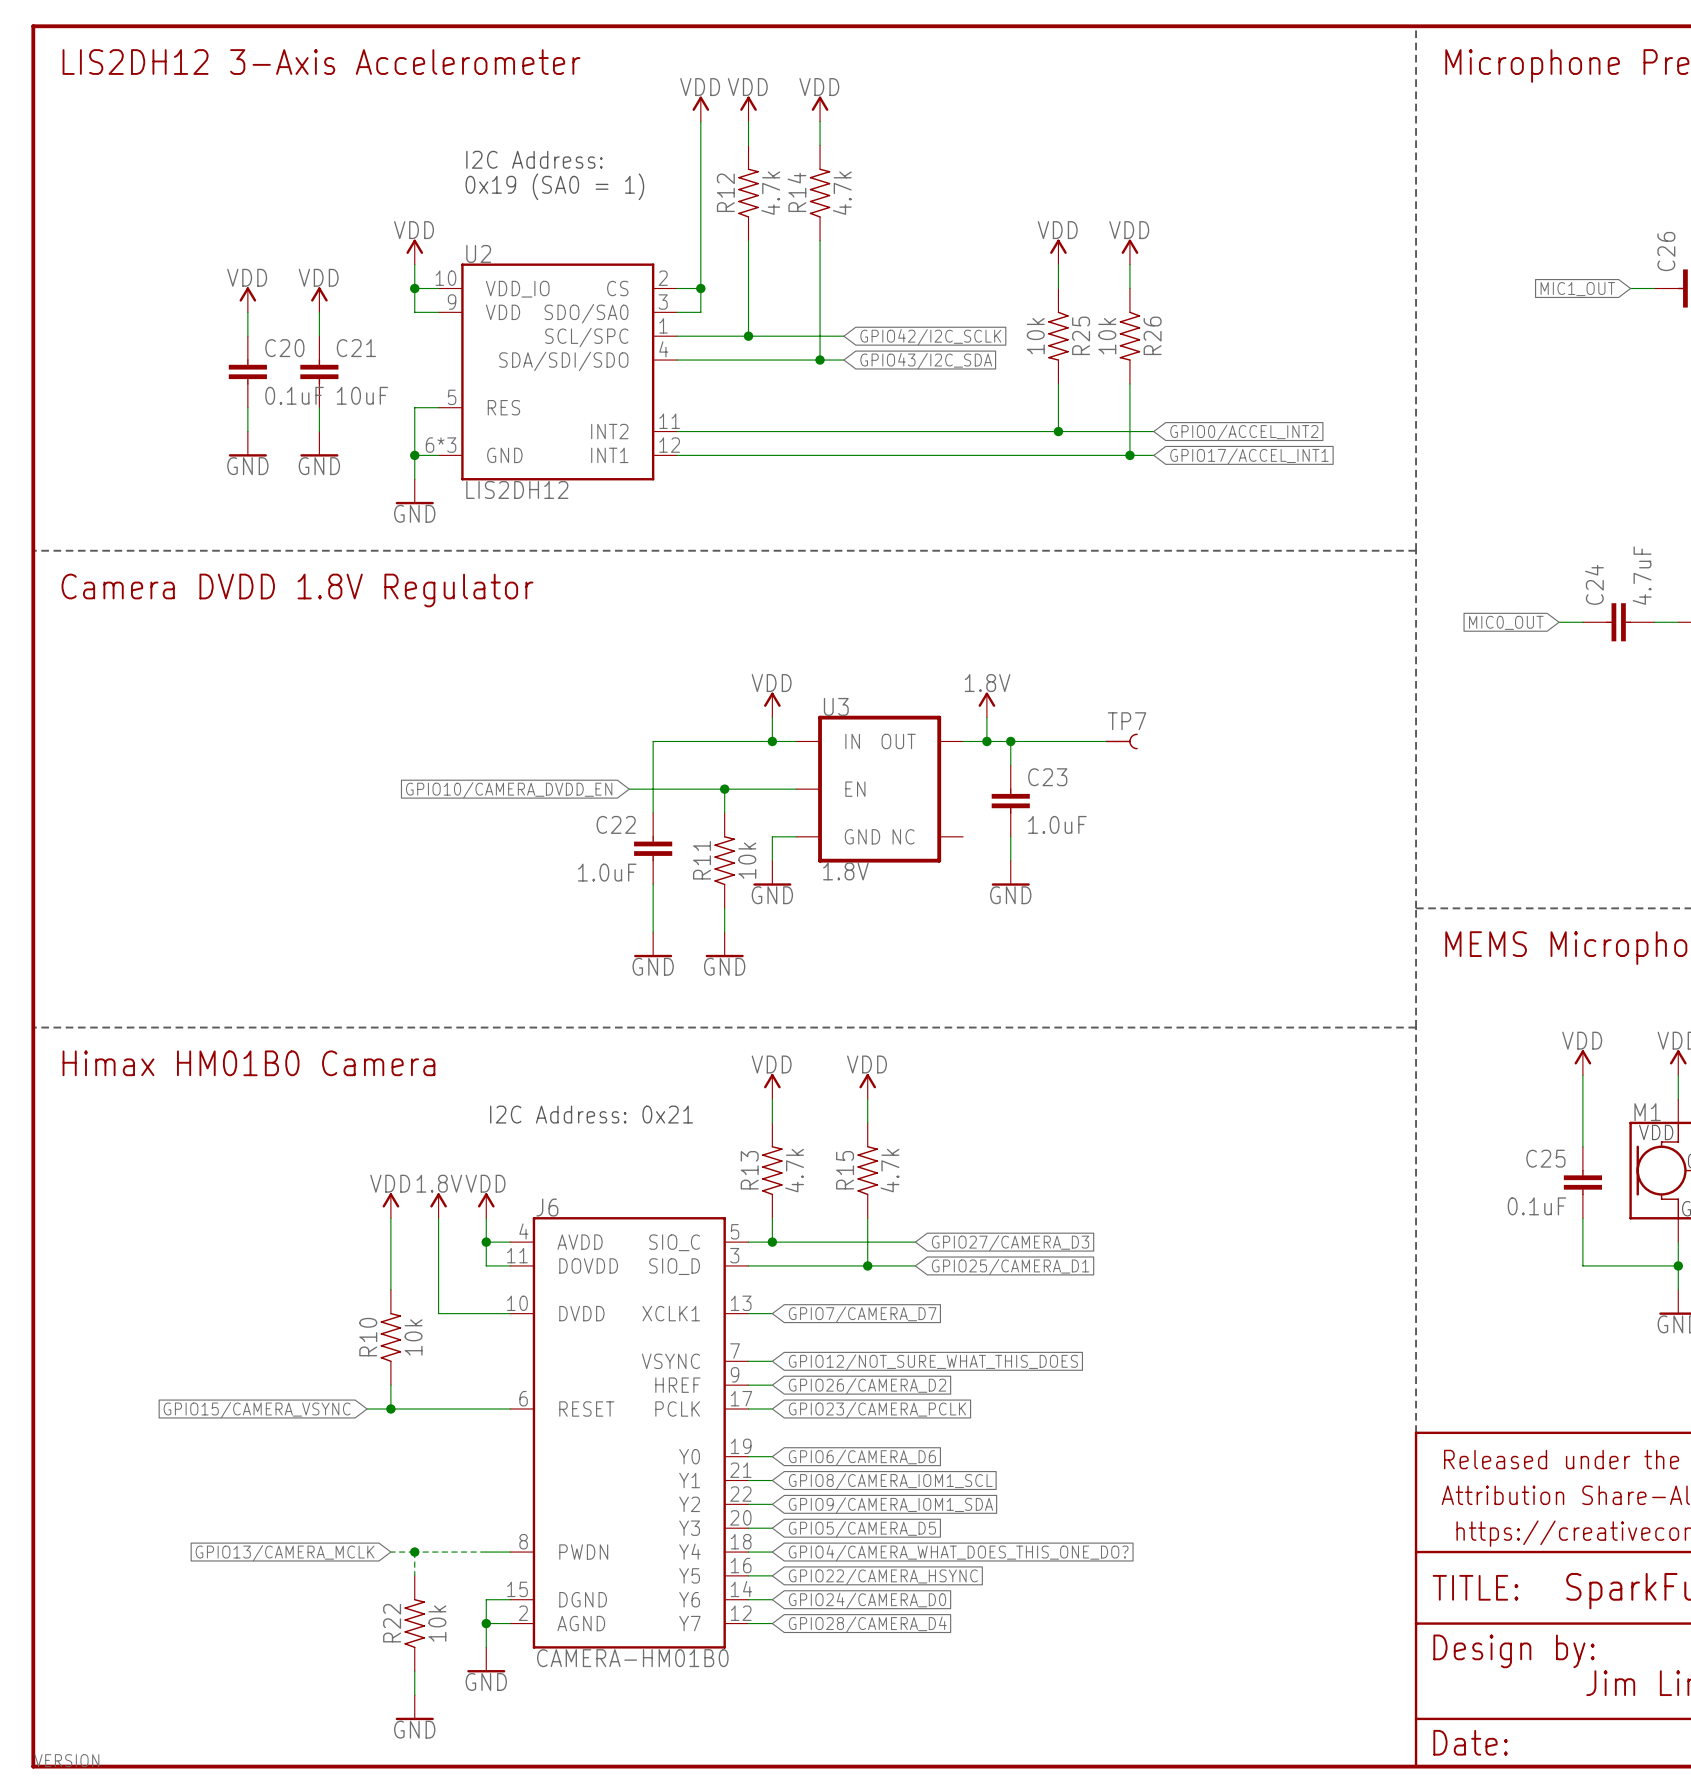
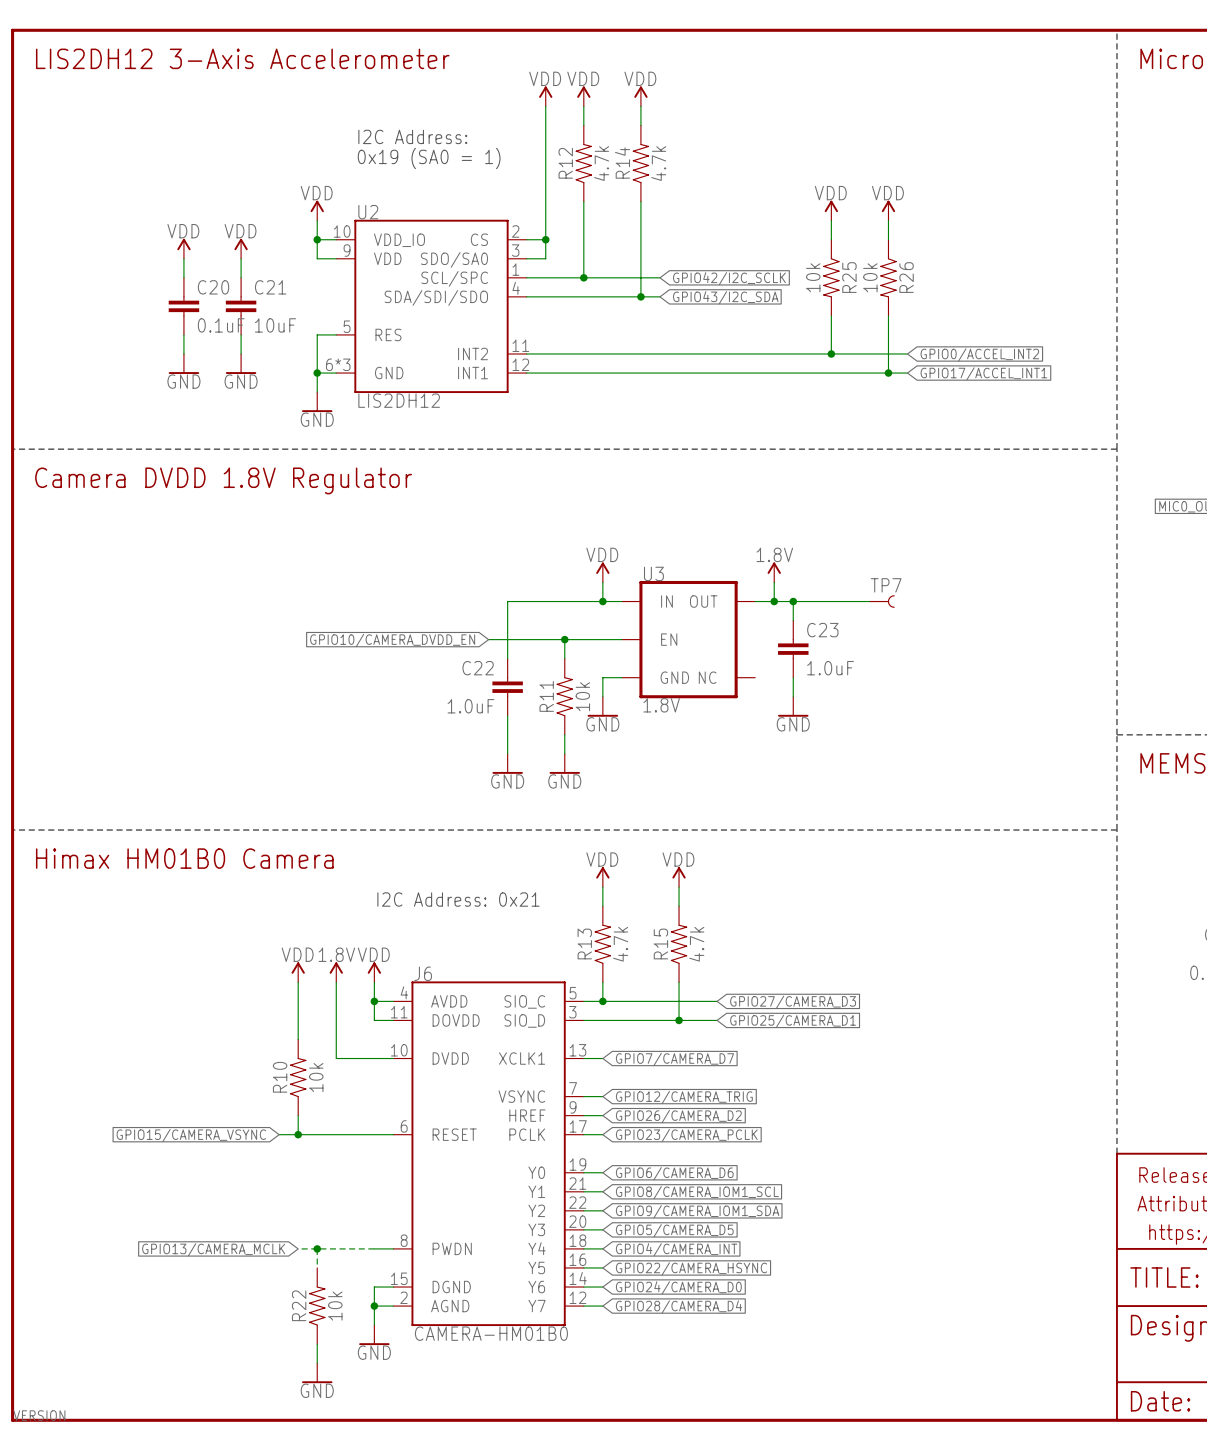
global label: GPIO12/NOT_SURE_WHAT_THIS_DOES (933, 1362) -> GPIO12/CAMERA_TRIG (684, 1097)
global label: GPIO4/CAMERA_WHAT_DOES_THIS_ONE_DO? (958, 1553) -> GPIO4/CAMERA_INT (676, 1249)

